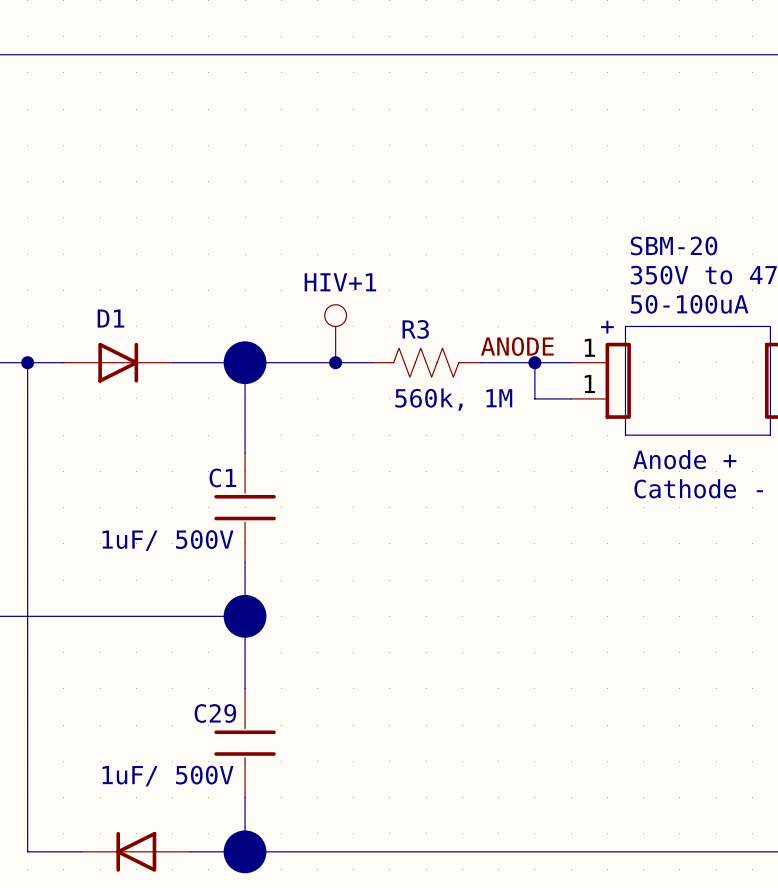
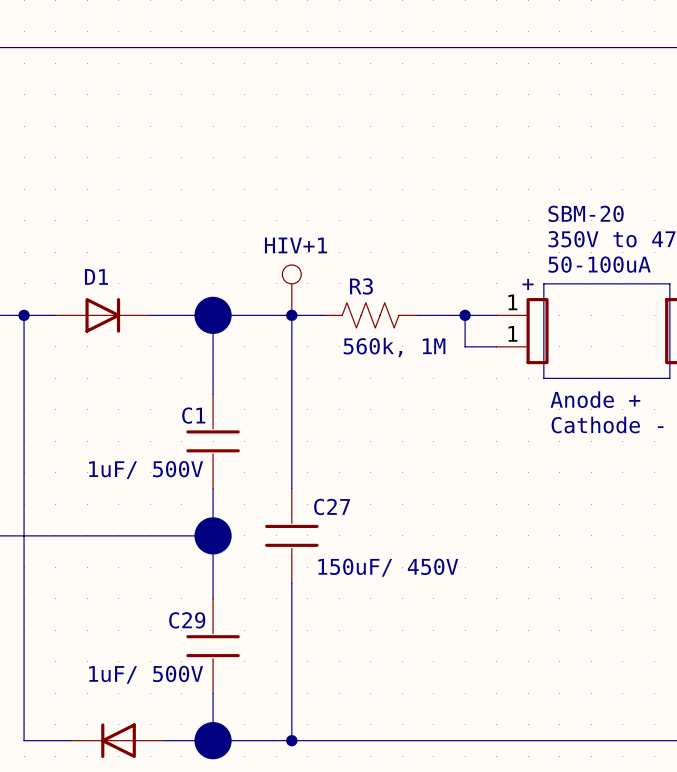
label: ANODE (517, 346) -> none
wire: none -> (291, 315) (291, 488)
C27: none -> 150uF/ 450V (291, 535)
wire: none -> (291, 583) (291, 740)
junction: none -> (291, 740)

